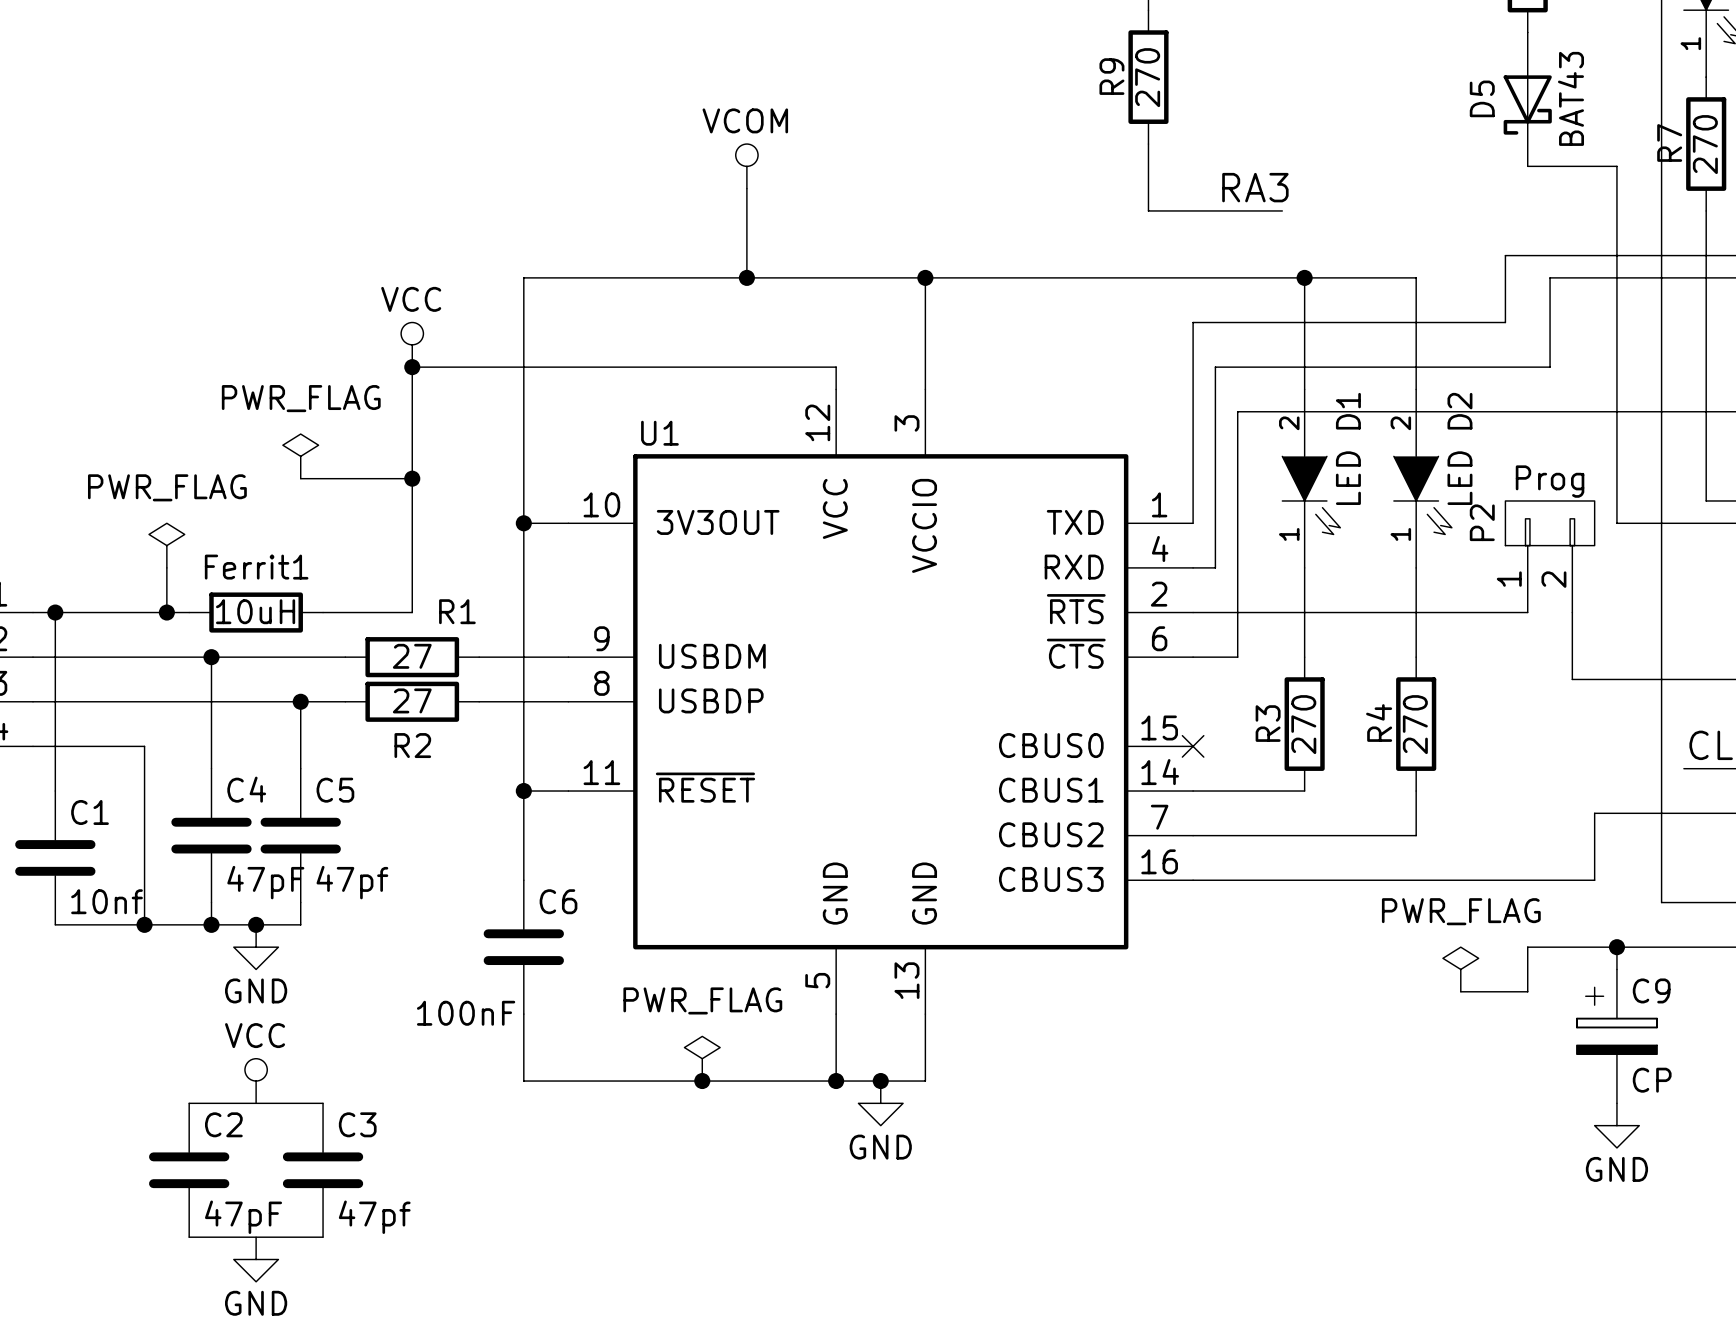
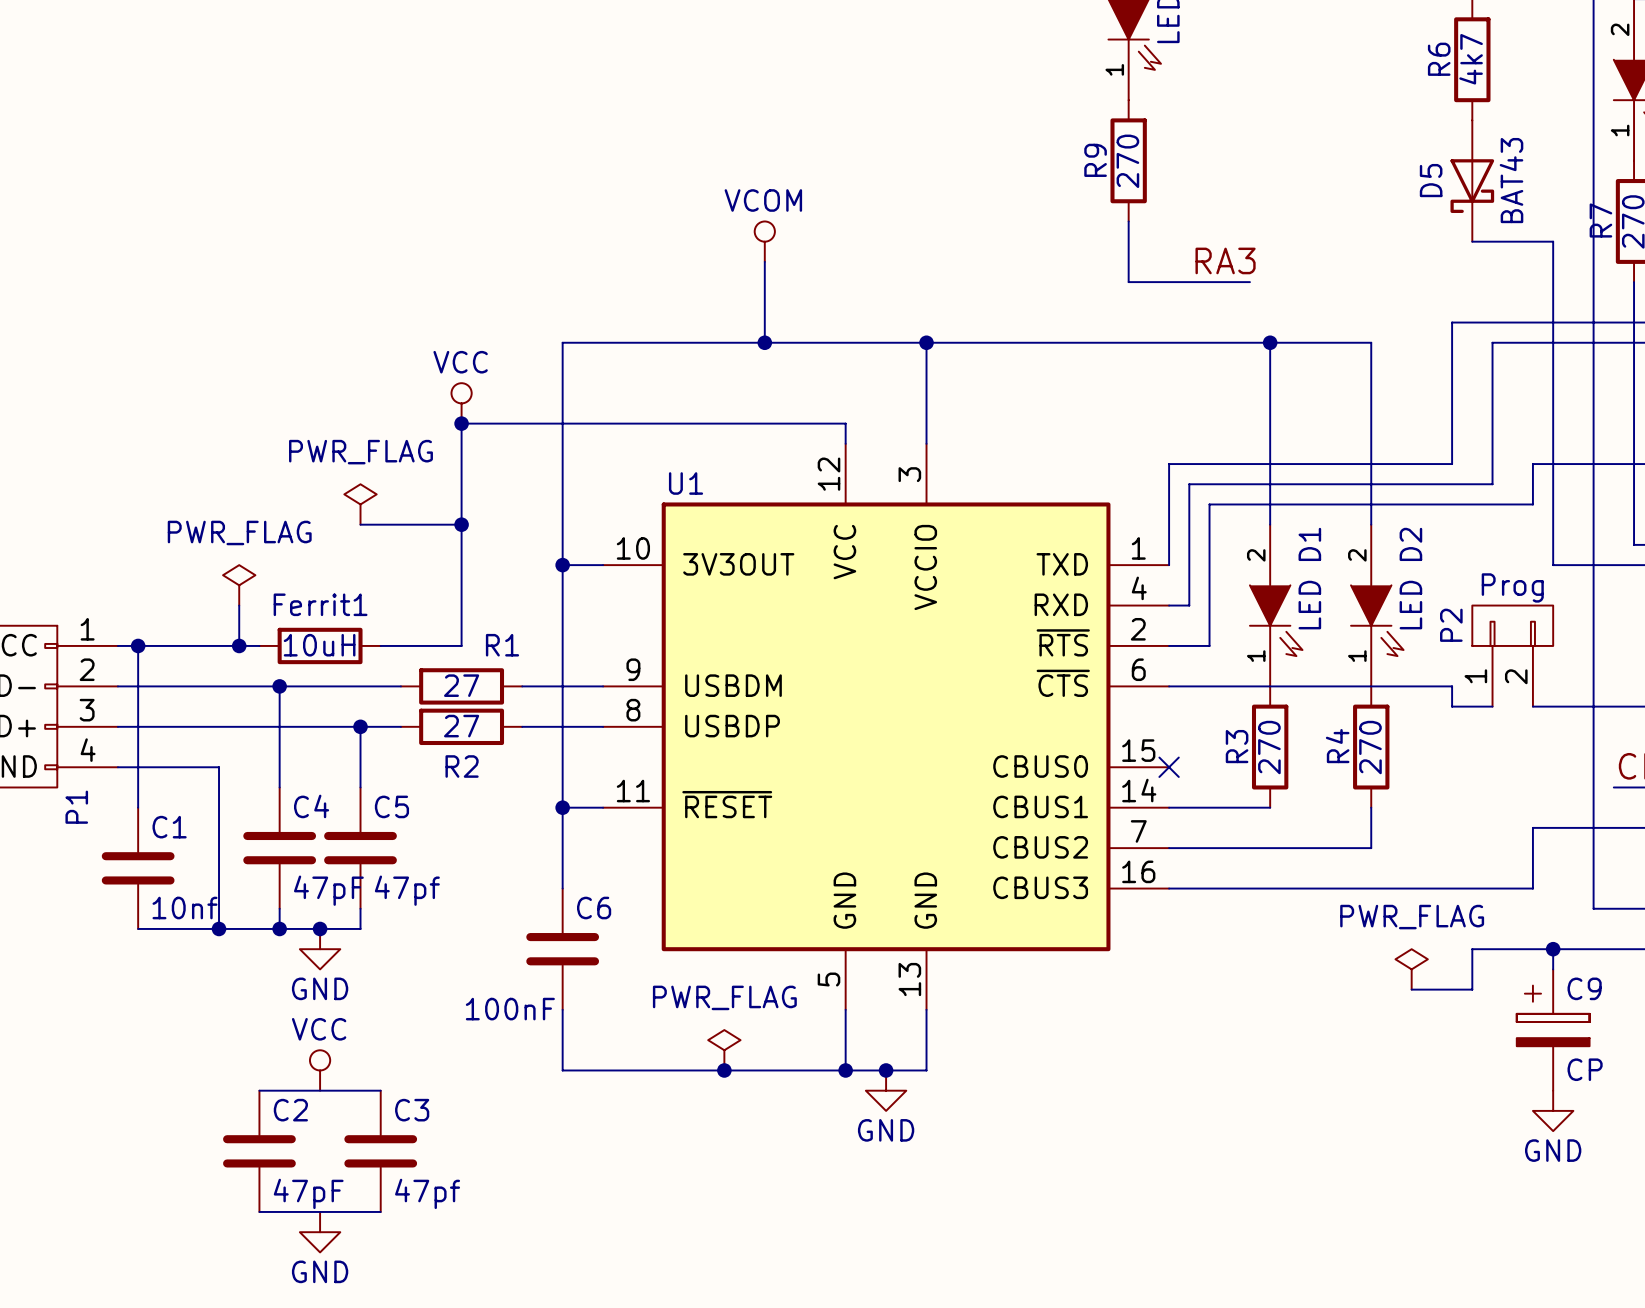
wire: (1505, 322) (1193, 322) (1193, 411) -> none
wire: (1550, 367) (1215, 367) (1215, 434) -> (1492, 423) (1492, 484) (1189, 484)
wire: (1237, 411) (1237, 456) -> (1209, 464) (1169, 464)
wire: (1505, 411) (1594, 411) -> (1452, 464) (1452, 383)
wire: none -> (1532, 464) (1532, 504) (1209, 504)
D1 position: (1311, 478) -> (1276, 605)
D2 position: (1422, 478) -> (1377, 605)
P2 position: (1550, 556) -> (1512, 656)
wire: (1527, 612) (1237, 612) (1237, 657) -> (1492, 706) (1452, 706) (1452, 686) (1209, 686)
wire: (1572, 612) (1572, 679) (1594, 679) -> none

